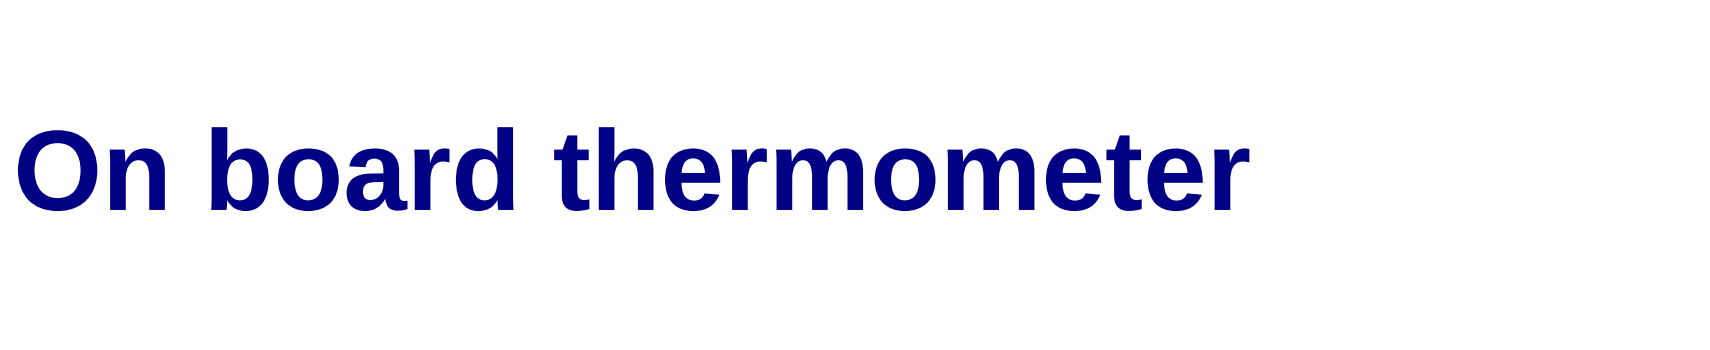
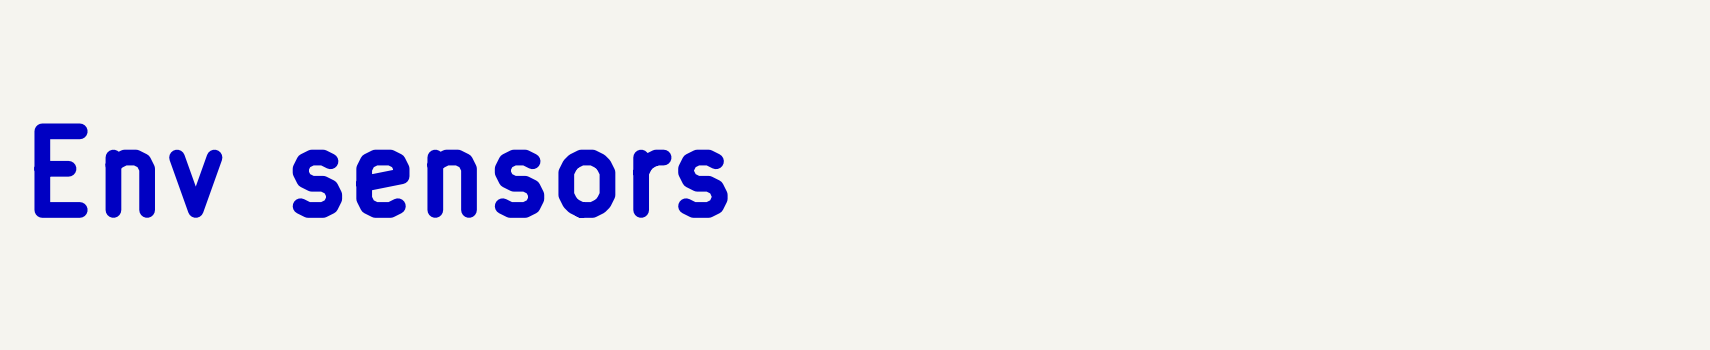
text: On board thermometer (633, 169) -> Env sensors (381, 170)

